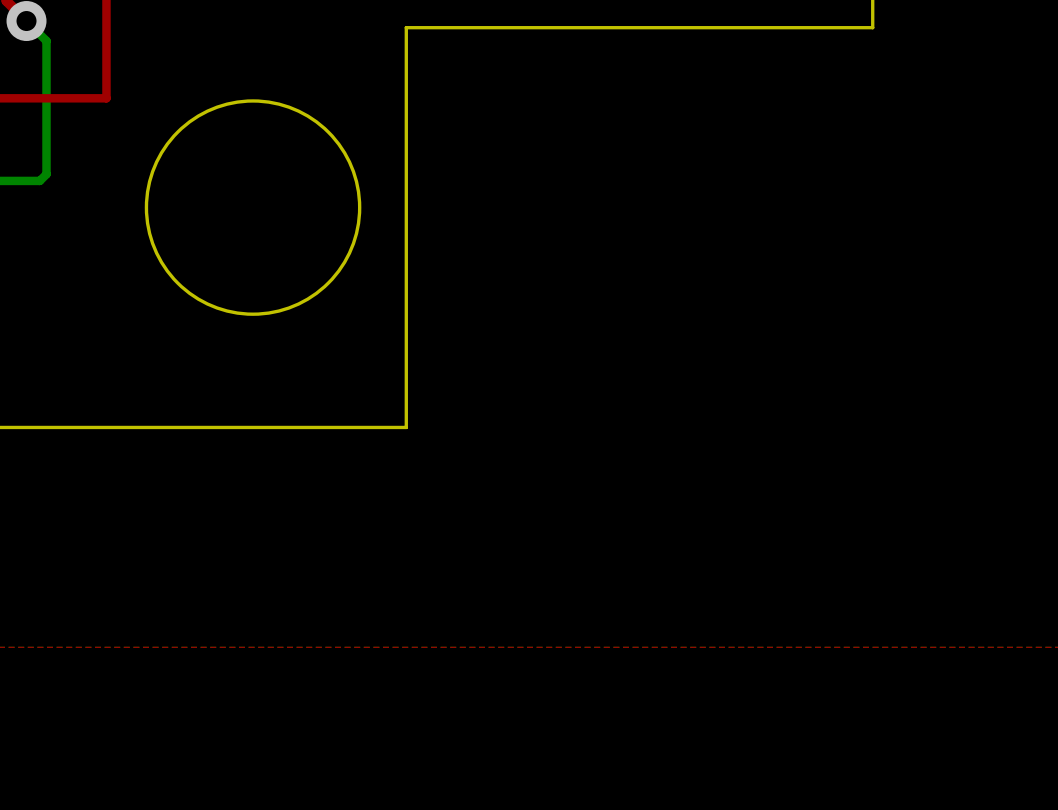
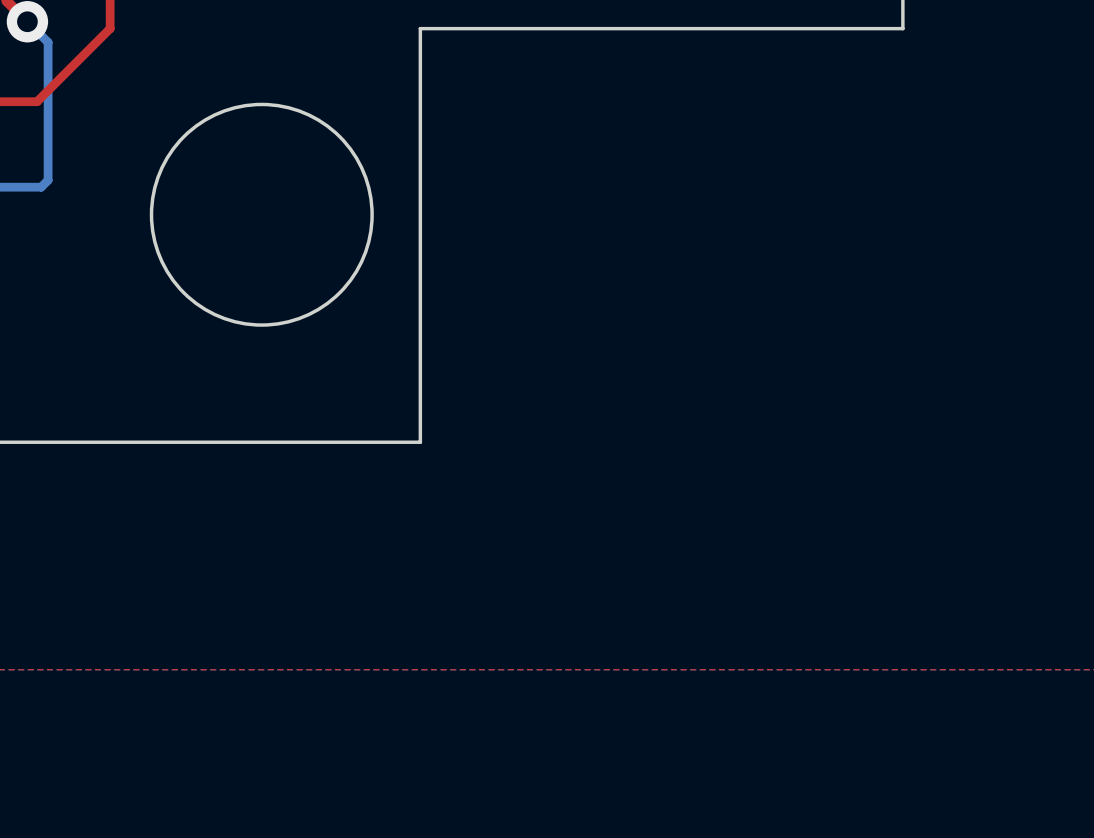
top track: (106, 27) (106, 98) (35, 98) -> (110, 28) (37, 101)

